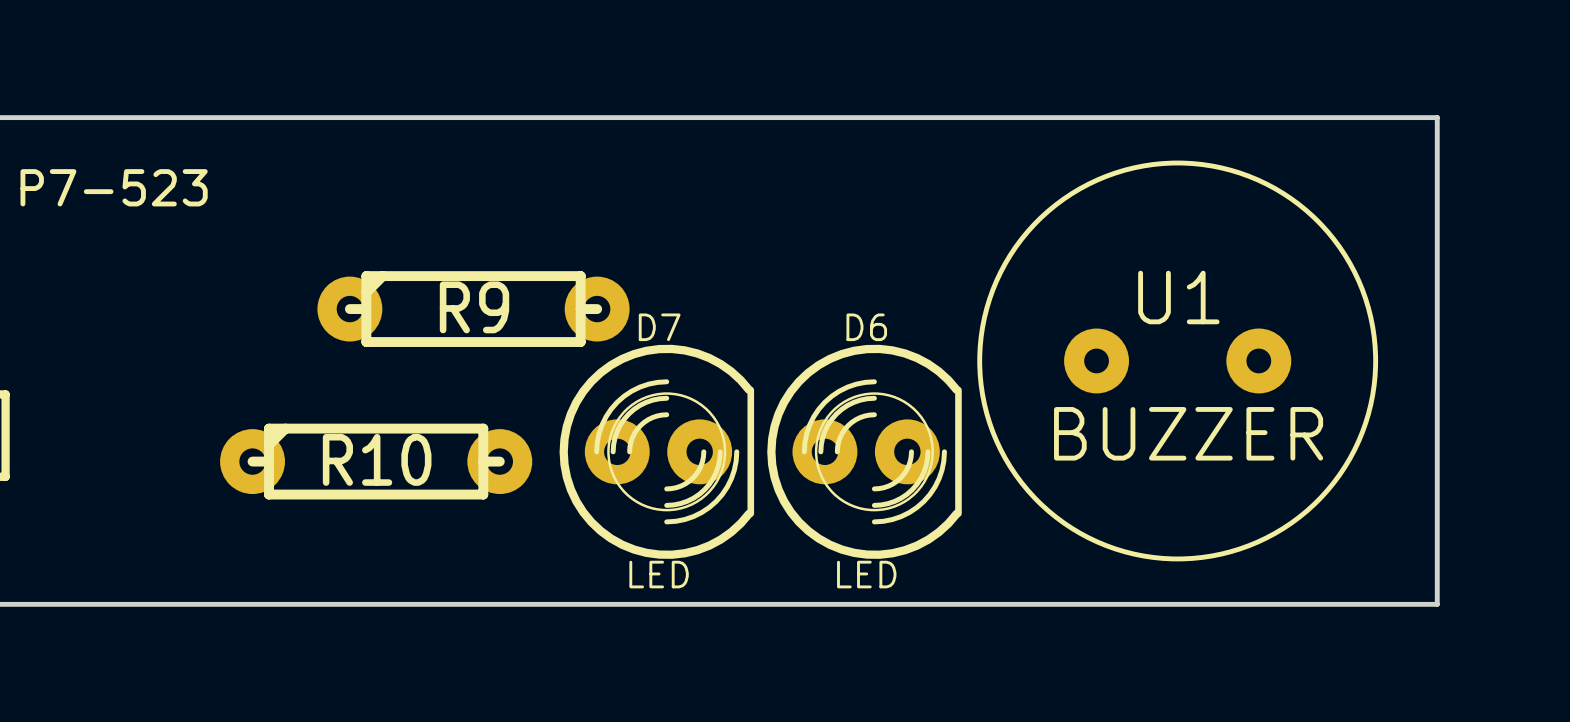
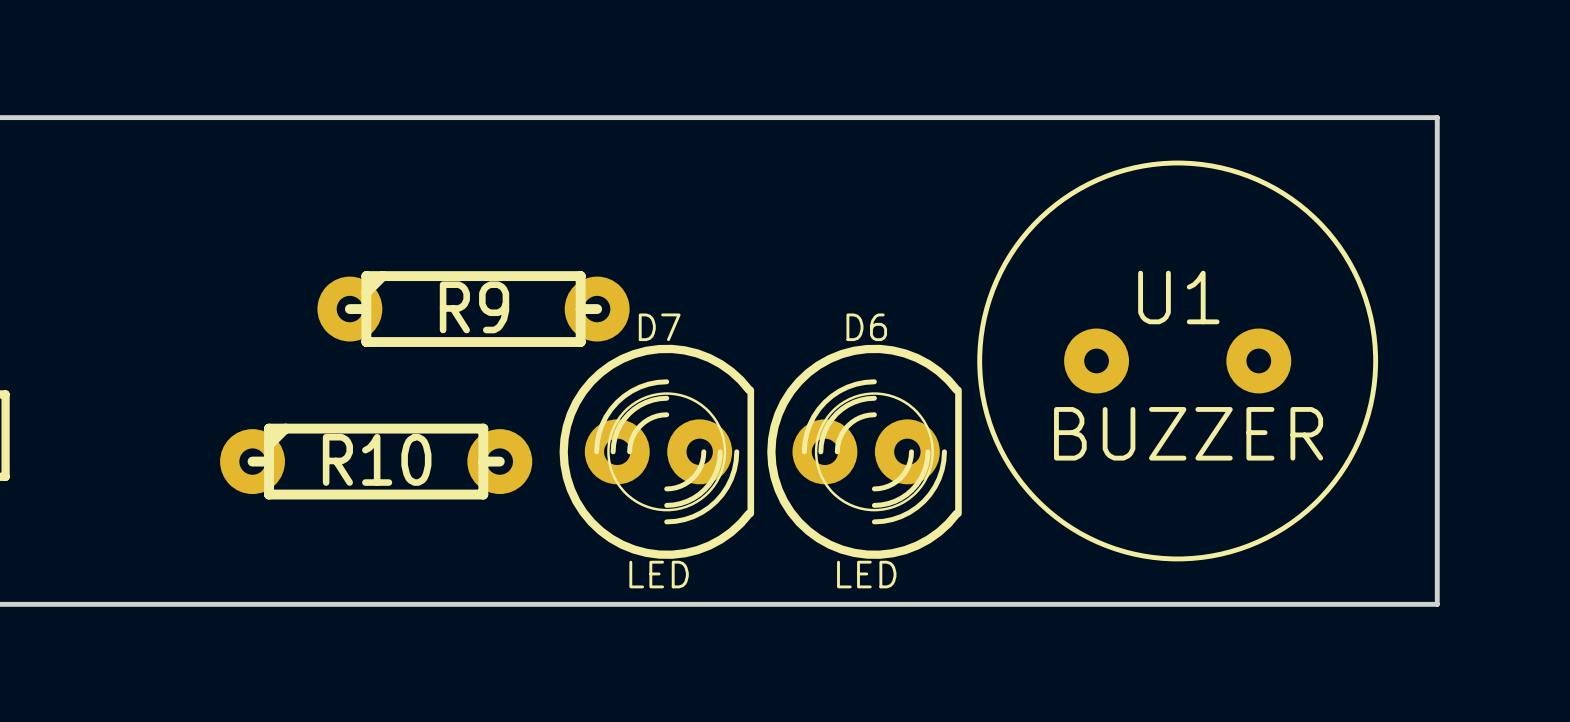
text: P7-523 (114, 187) -> none

